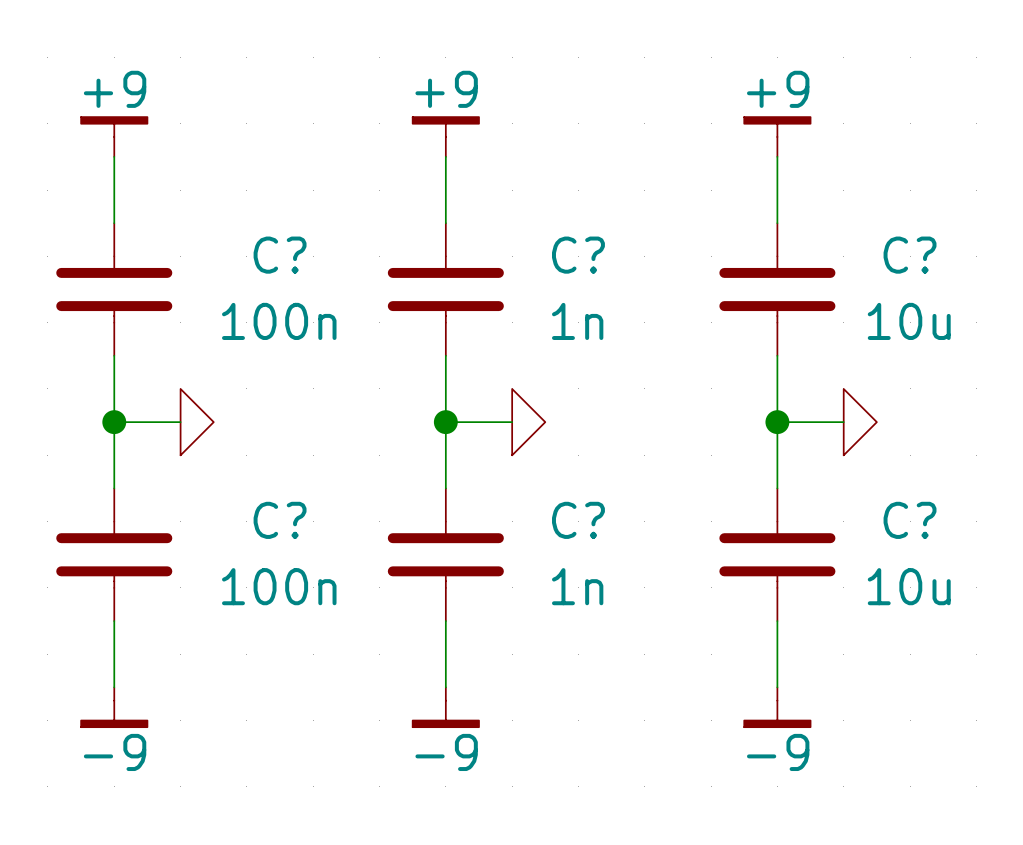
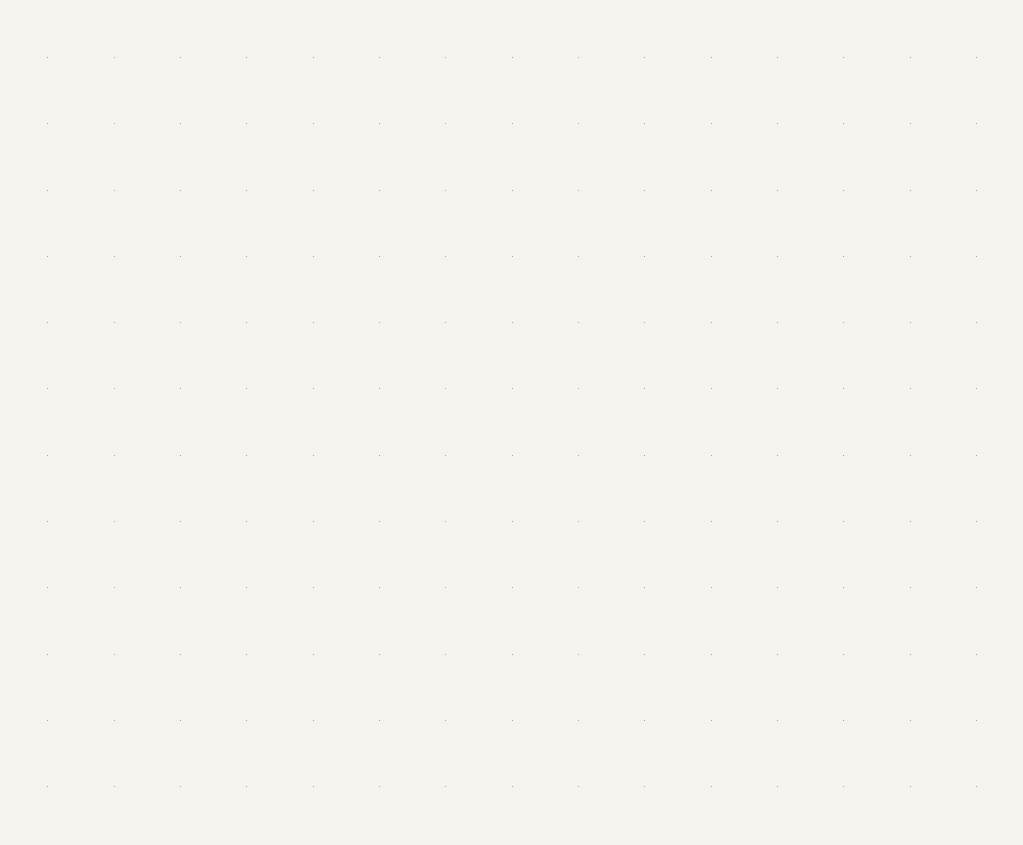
power symbol: +9 (114, 136) -> none
power symbol: +9 (445, 136) -> none
power symbol: +9 (777, 136) -> none
wire: (114, 156) (114, 223) -> none
wire: (445, 156) (445, 223) -> none
wire: (777, 156) (777, 223) -> none
C?: 100n (114, 289) -> none
C?: 1n (445, 289) -> none
C?: 10u (777, 289) -> none
wire: (114, 355) (114, 488) -> none
wire: (445, 355) (445, 488) -> none
wire: (777, 355) (777, 488) -> none
wire: (114, 422) (180, 422) -> none
junction: (114, 422) -> none
power symbol: (197, 422) -> none
wire: (445, 422) (512, 422) -> none
junction: (445, 422) -> none
power symbol: (528, 422) -> none
wire: (777, 422) (843, 422) -> none
junction: (777, 422) -> none
power symbol: (860, 422) -> none
C?: 100n (114, 554) -> none
C?: 1n (445, 554) -> none
C?: 10u (777, 554) -> none
wire: (114, 621) (114, 687) -> none
wire: (445, 621) (445, 687) -> none
wire: (777, 621) (777, 687) -> none
power symbol: -9 (114, 707) -> none
power symbol: -9 (445, 707) -> none
power symbol: -9 (777, 707) -> none

